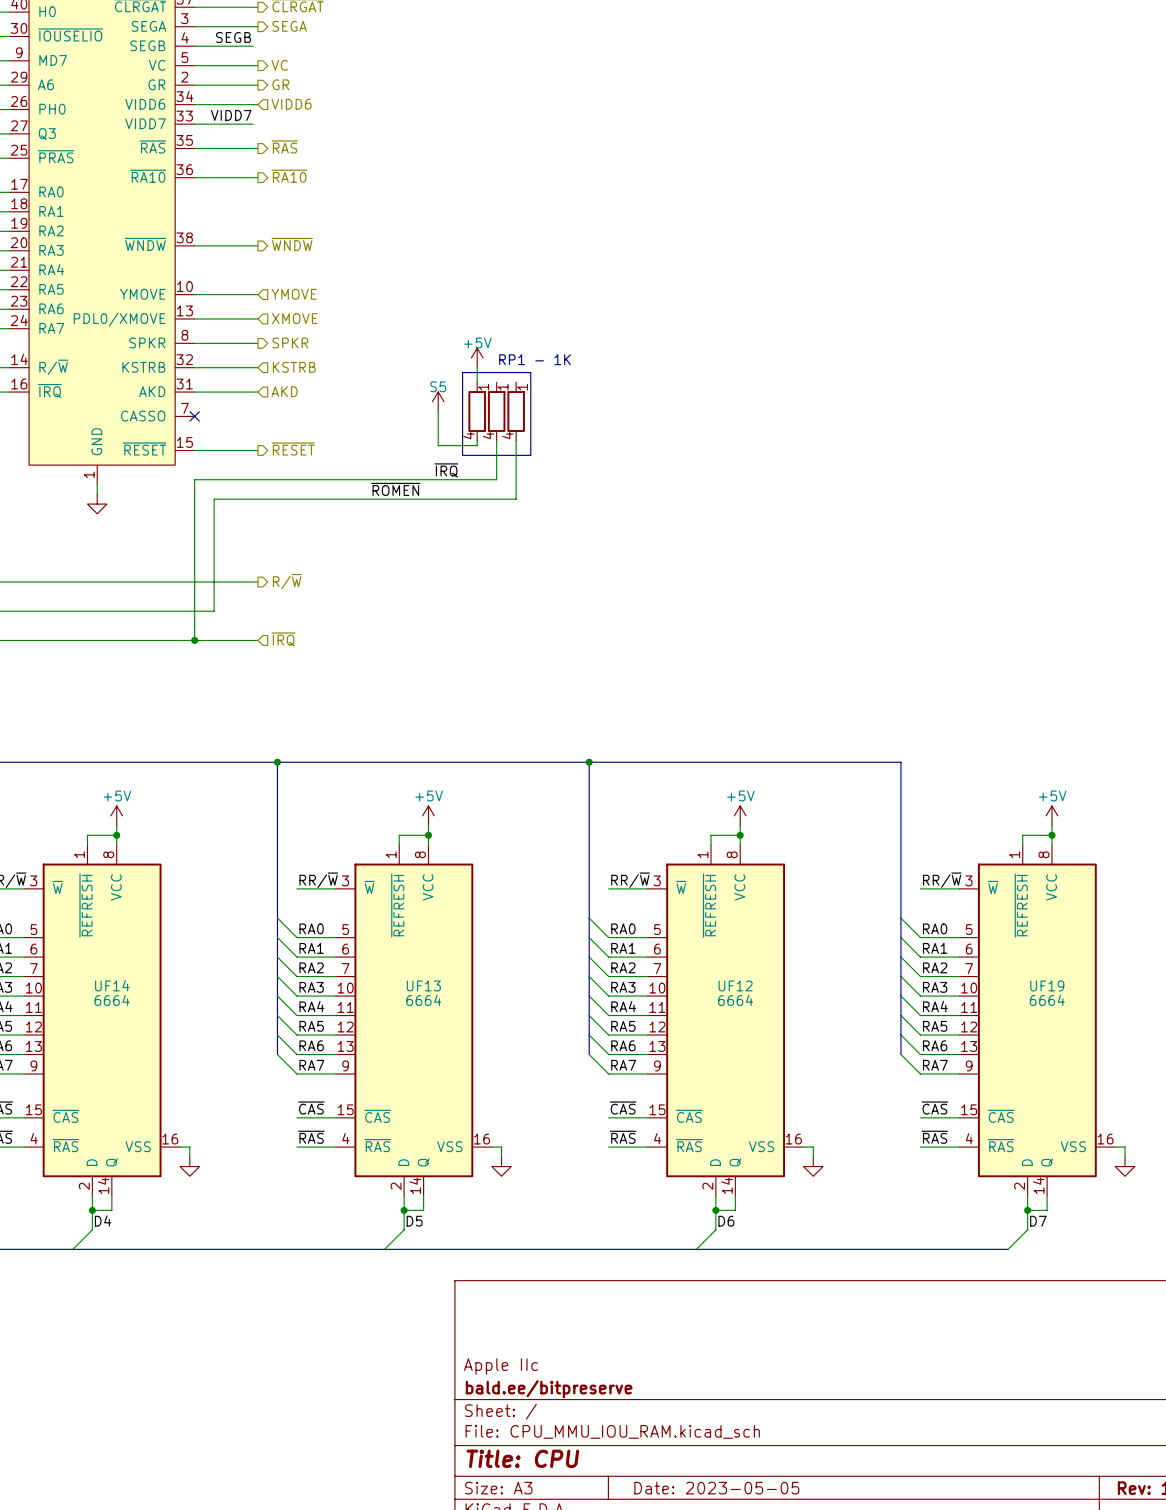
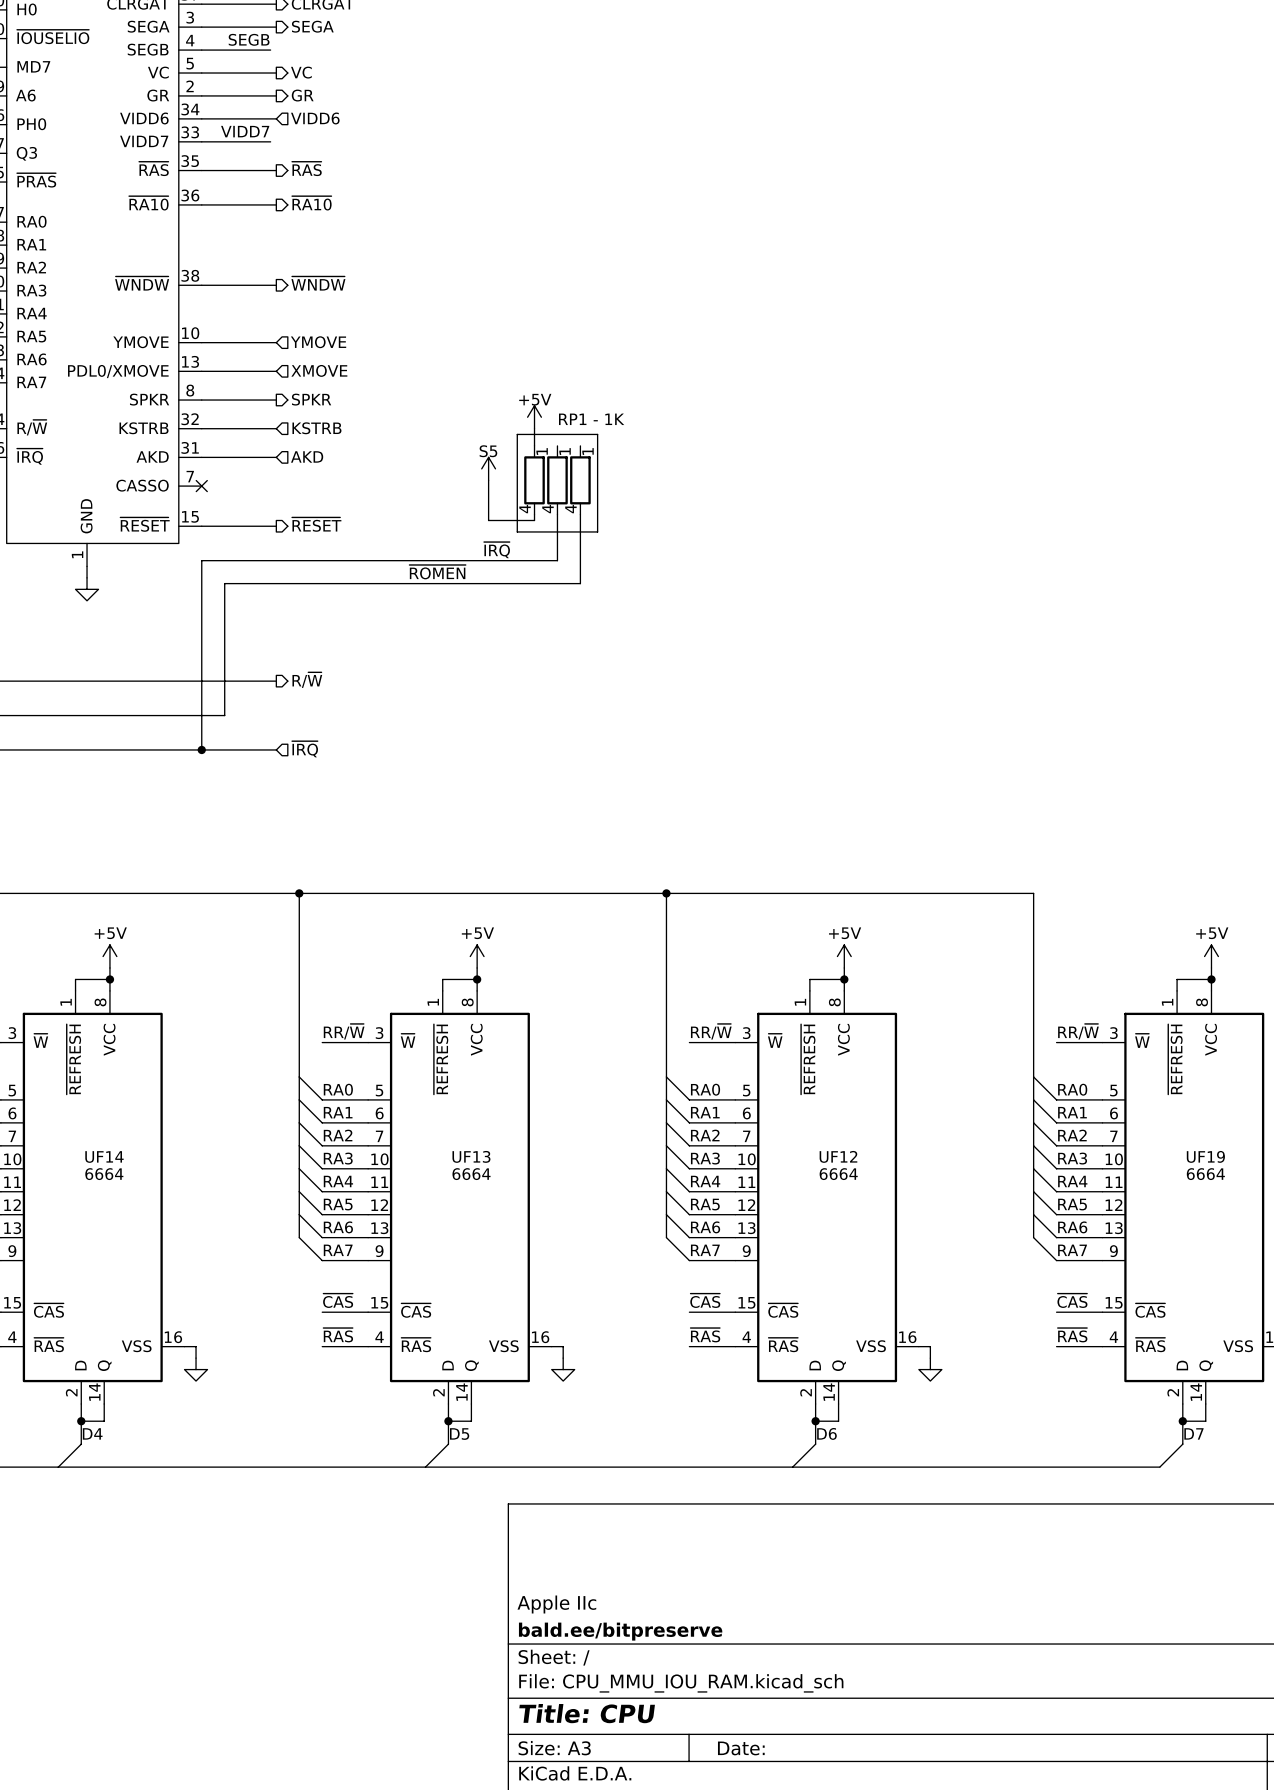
title block: Date: 2023-05-05 (716, 1488) -> Date: (741, 1748)

